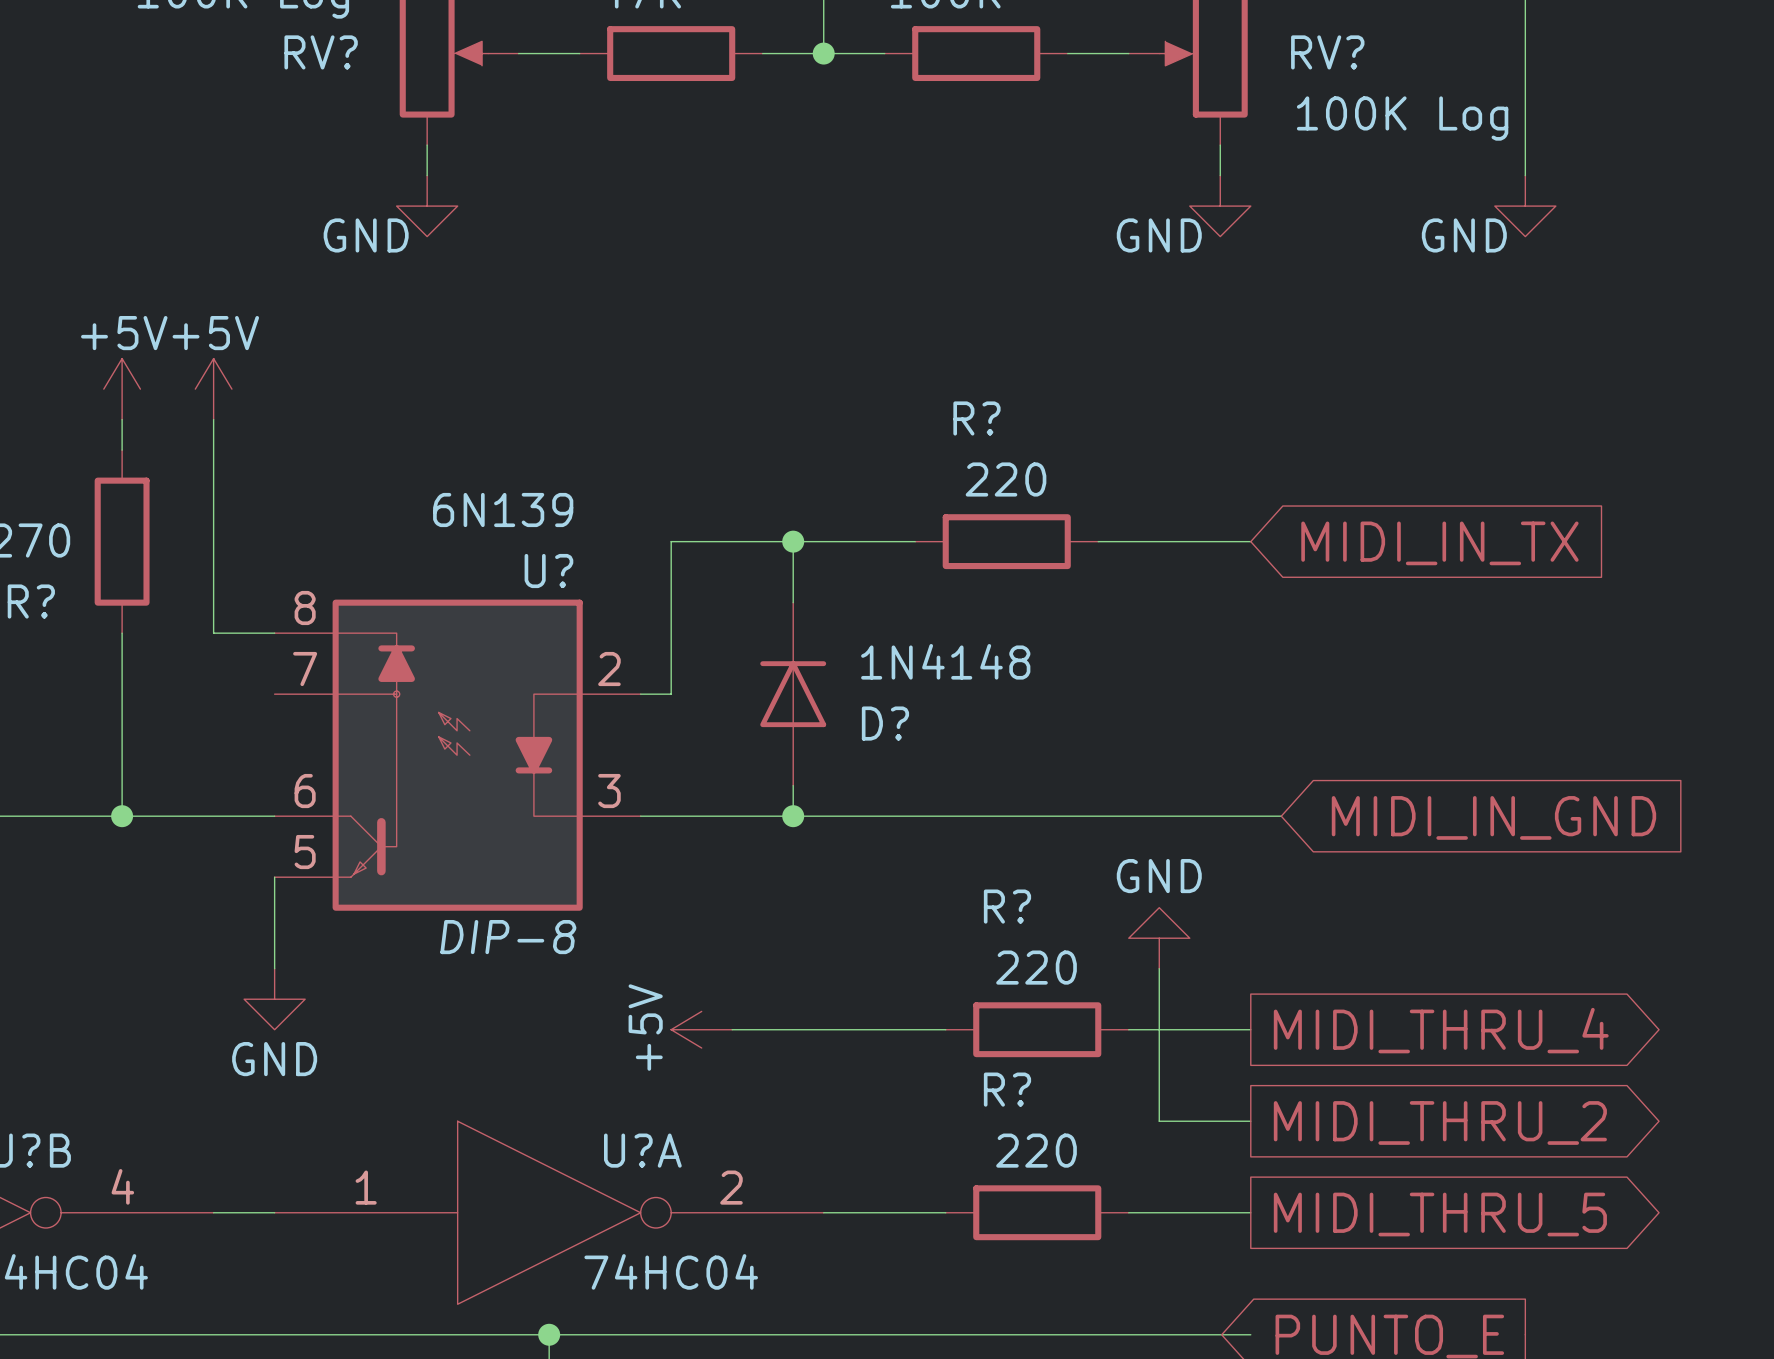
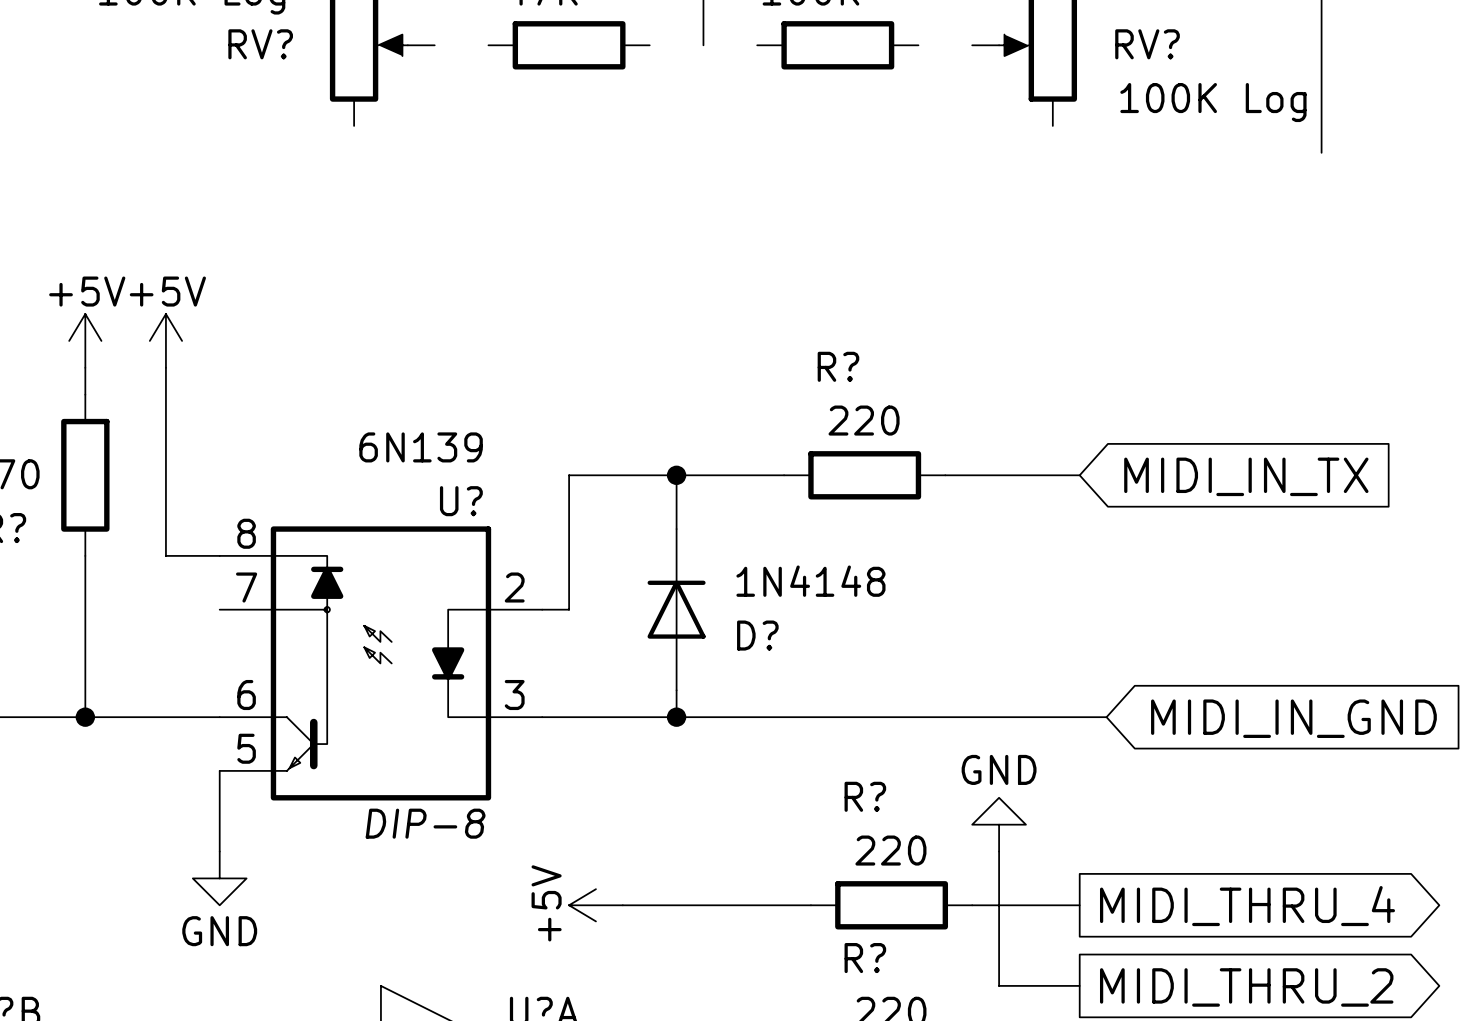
wire: (518, 53) (579, 53) -> none
wire: (762, 53) (884, 53) -> none
junction: (823, 53) -> none
wire: (1067, 53) (1128, 53) -> none
wire: (427, 145) (427, 175) -> none
wire: (1220, 145) (1220, 175) -> none
power symbol: GND (427, 206) -> none
power symbol: GND (1220, 206) -> none
power symbol: GND (1525, 206) -> none

